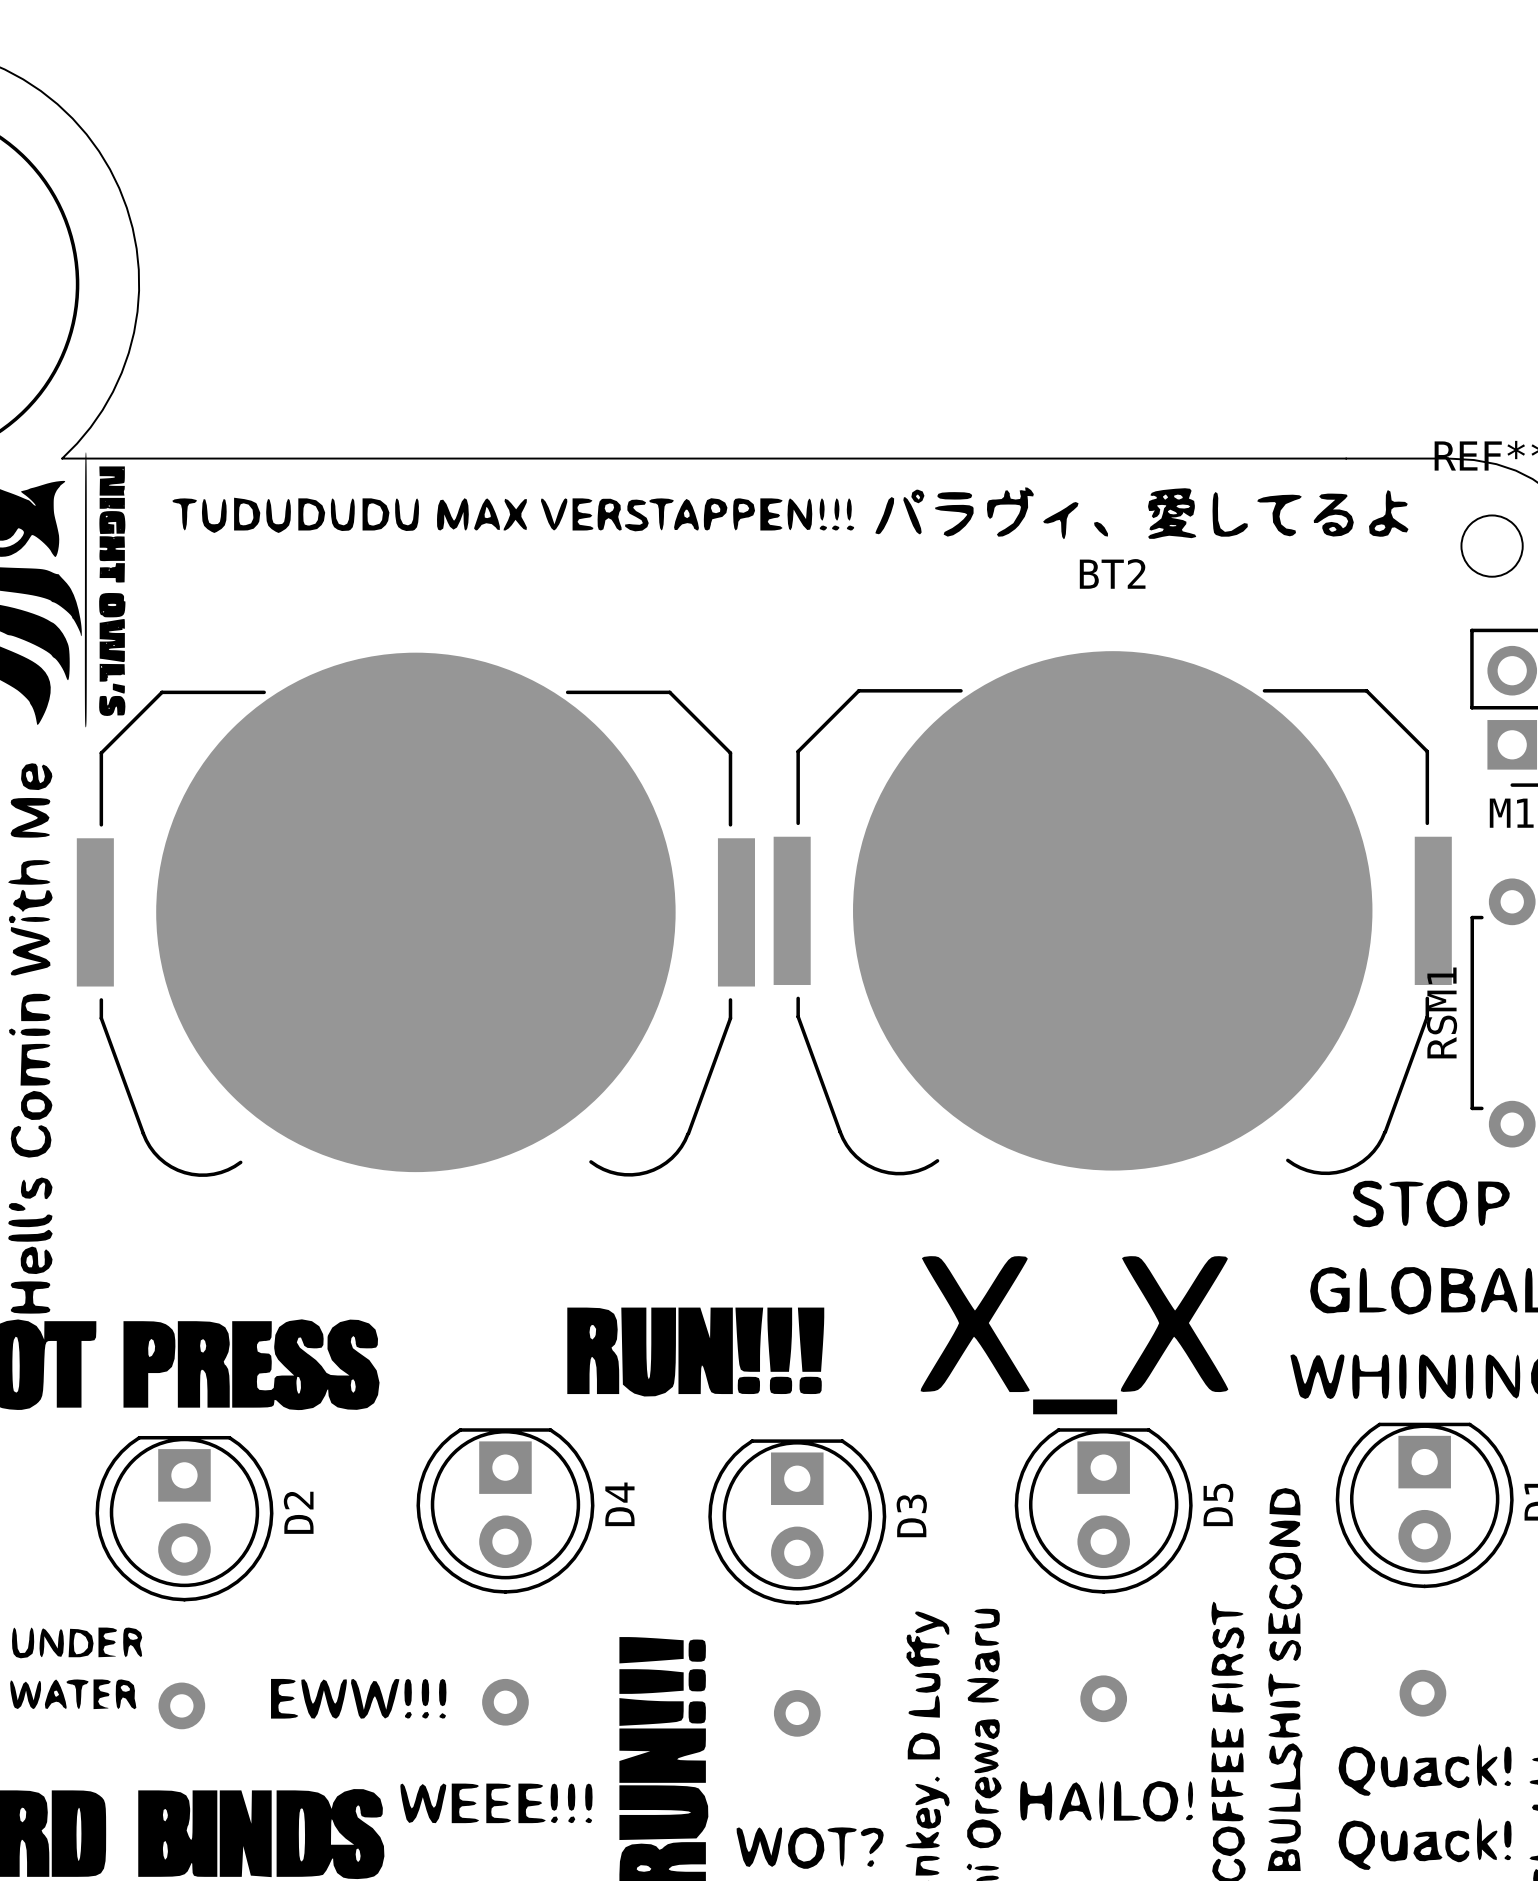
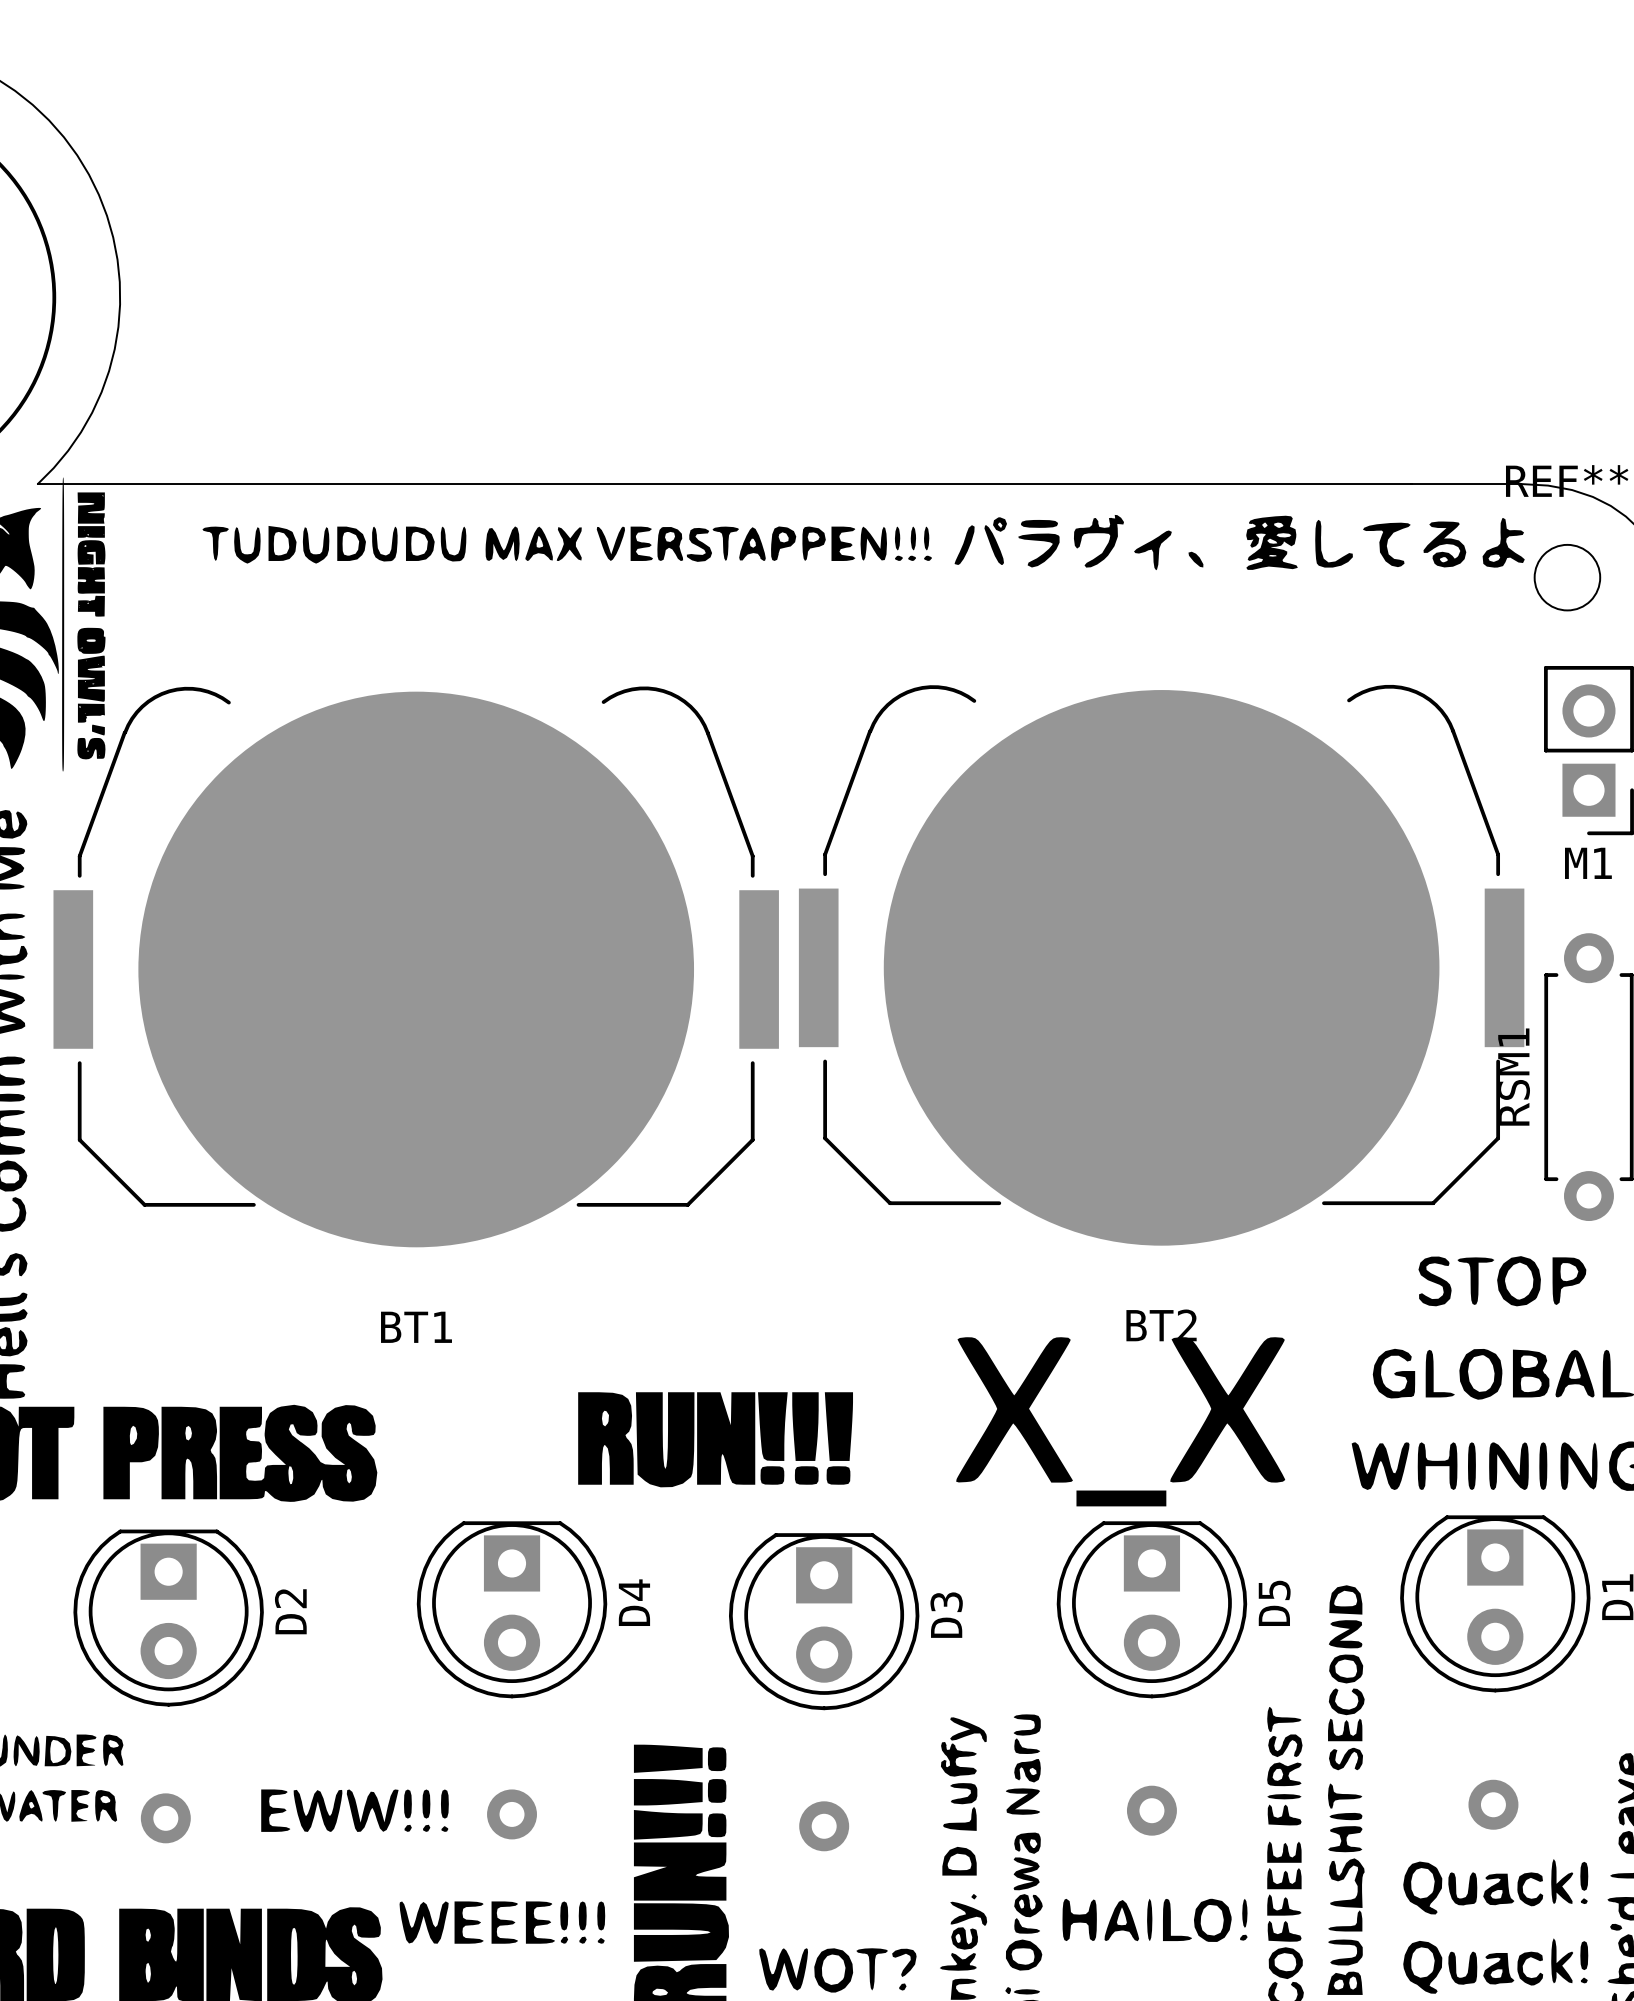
drawing position: (1141, 513) -> (1239, 542)
drawing position: (513, 515) -> (567, 544)
BT1: none -> (416, 966)
BT2 rotation: 0° (1112, 913) -> 180° (1161, 965)
part: (415, 914) -> none

